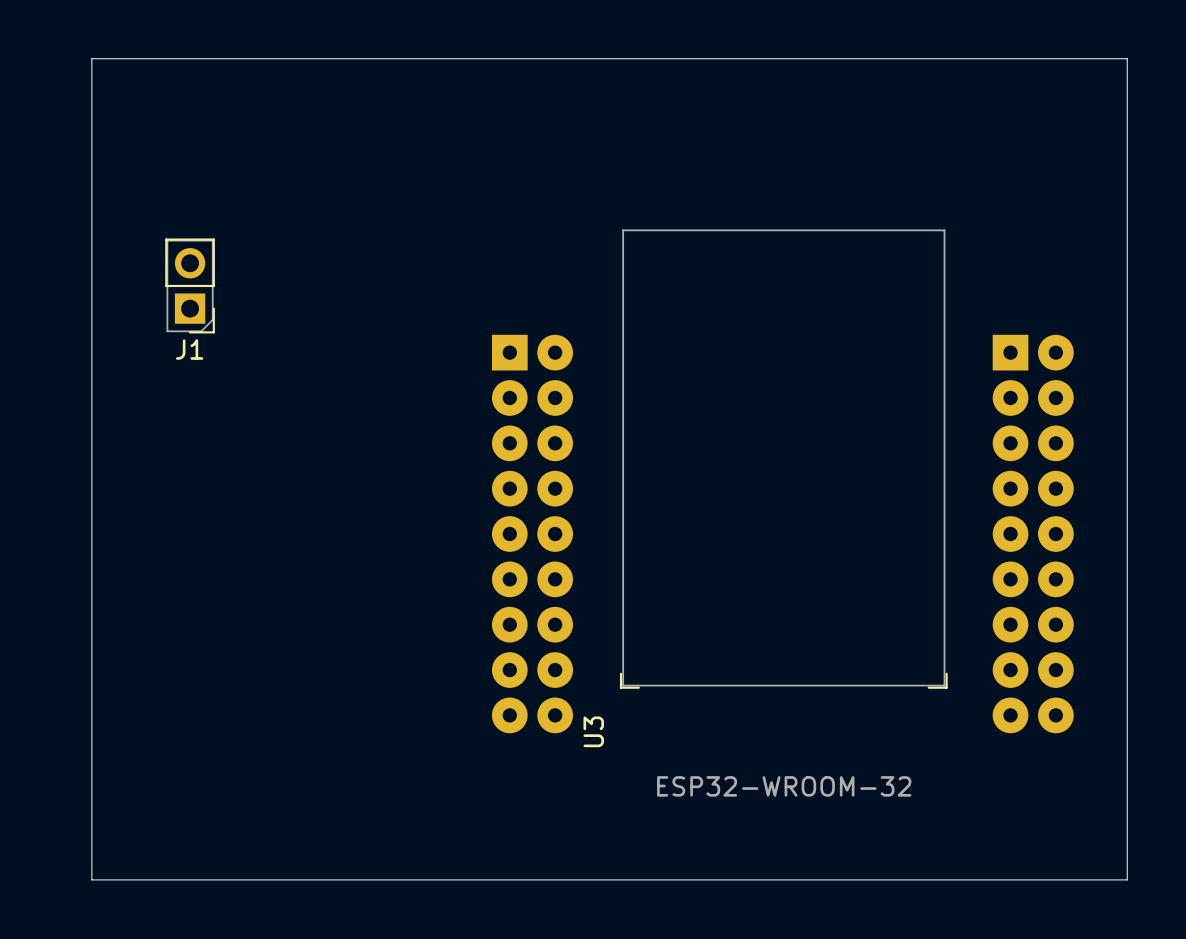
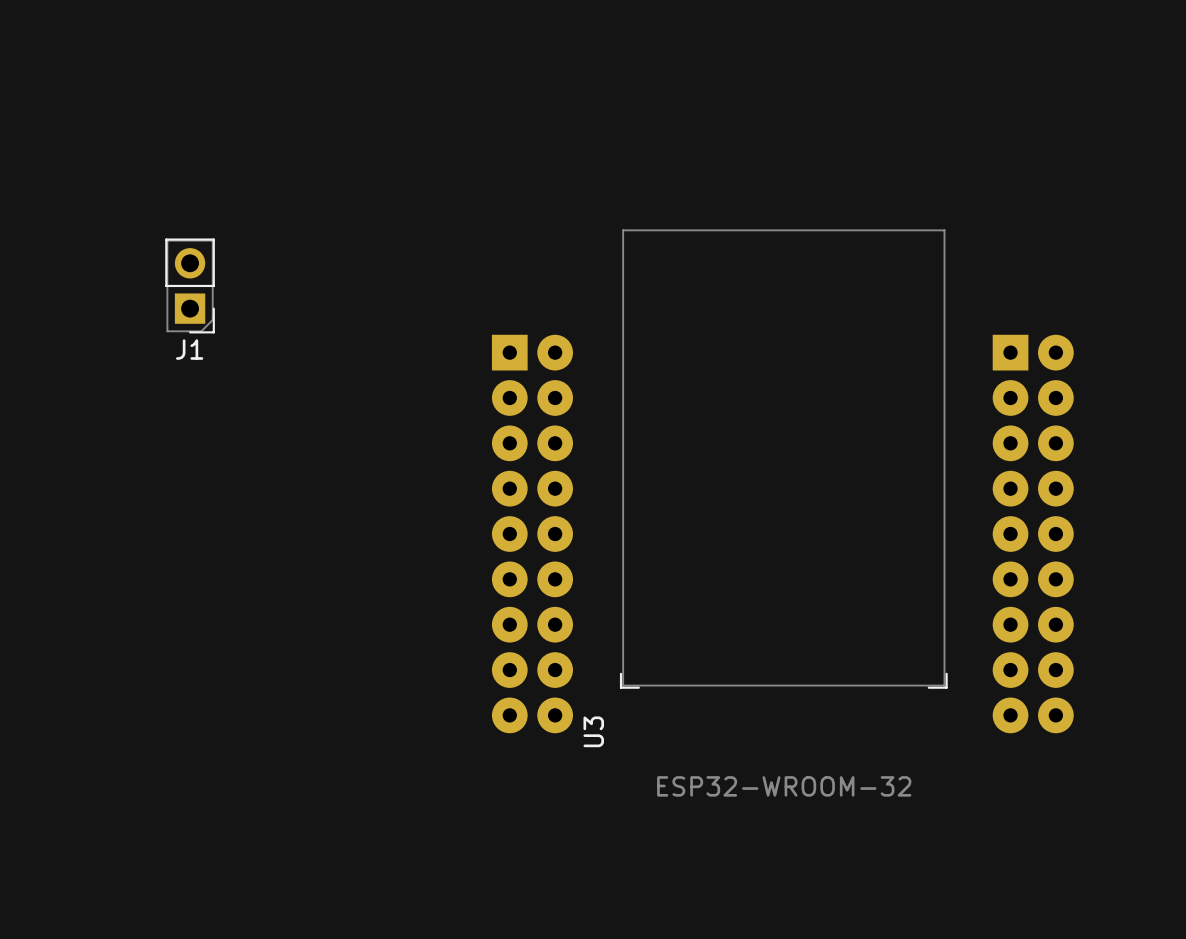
board edge: (91, 58) (1127, 58) (1127, 879) (91, 879) (91, 58) -> none

